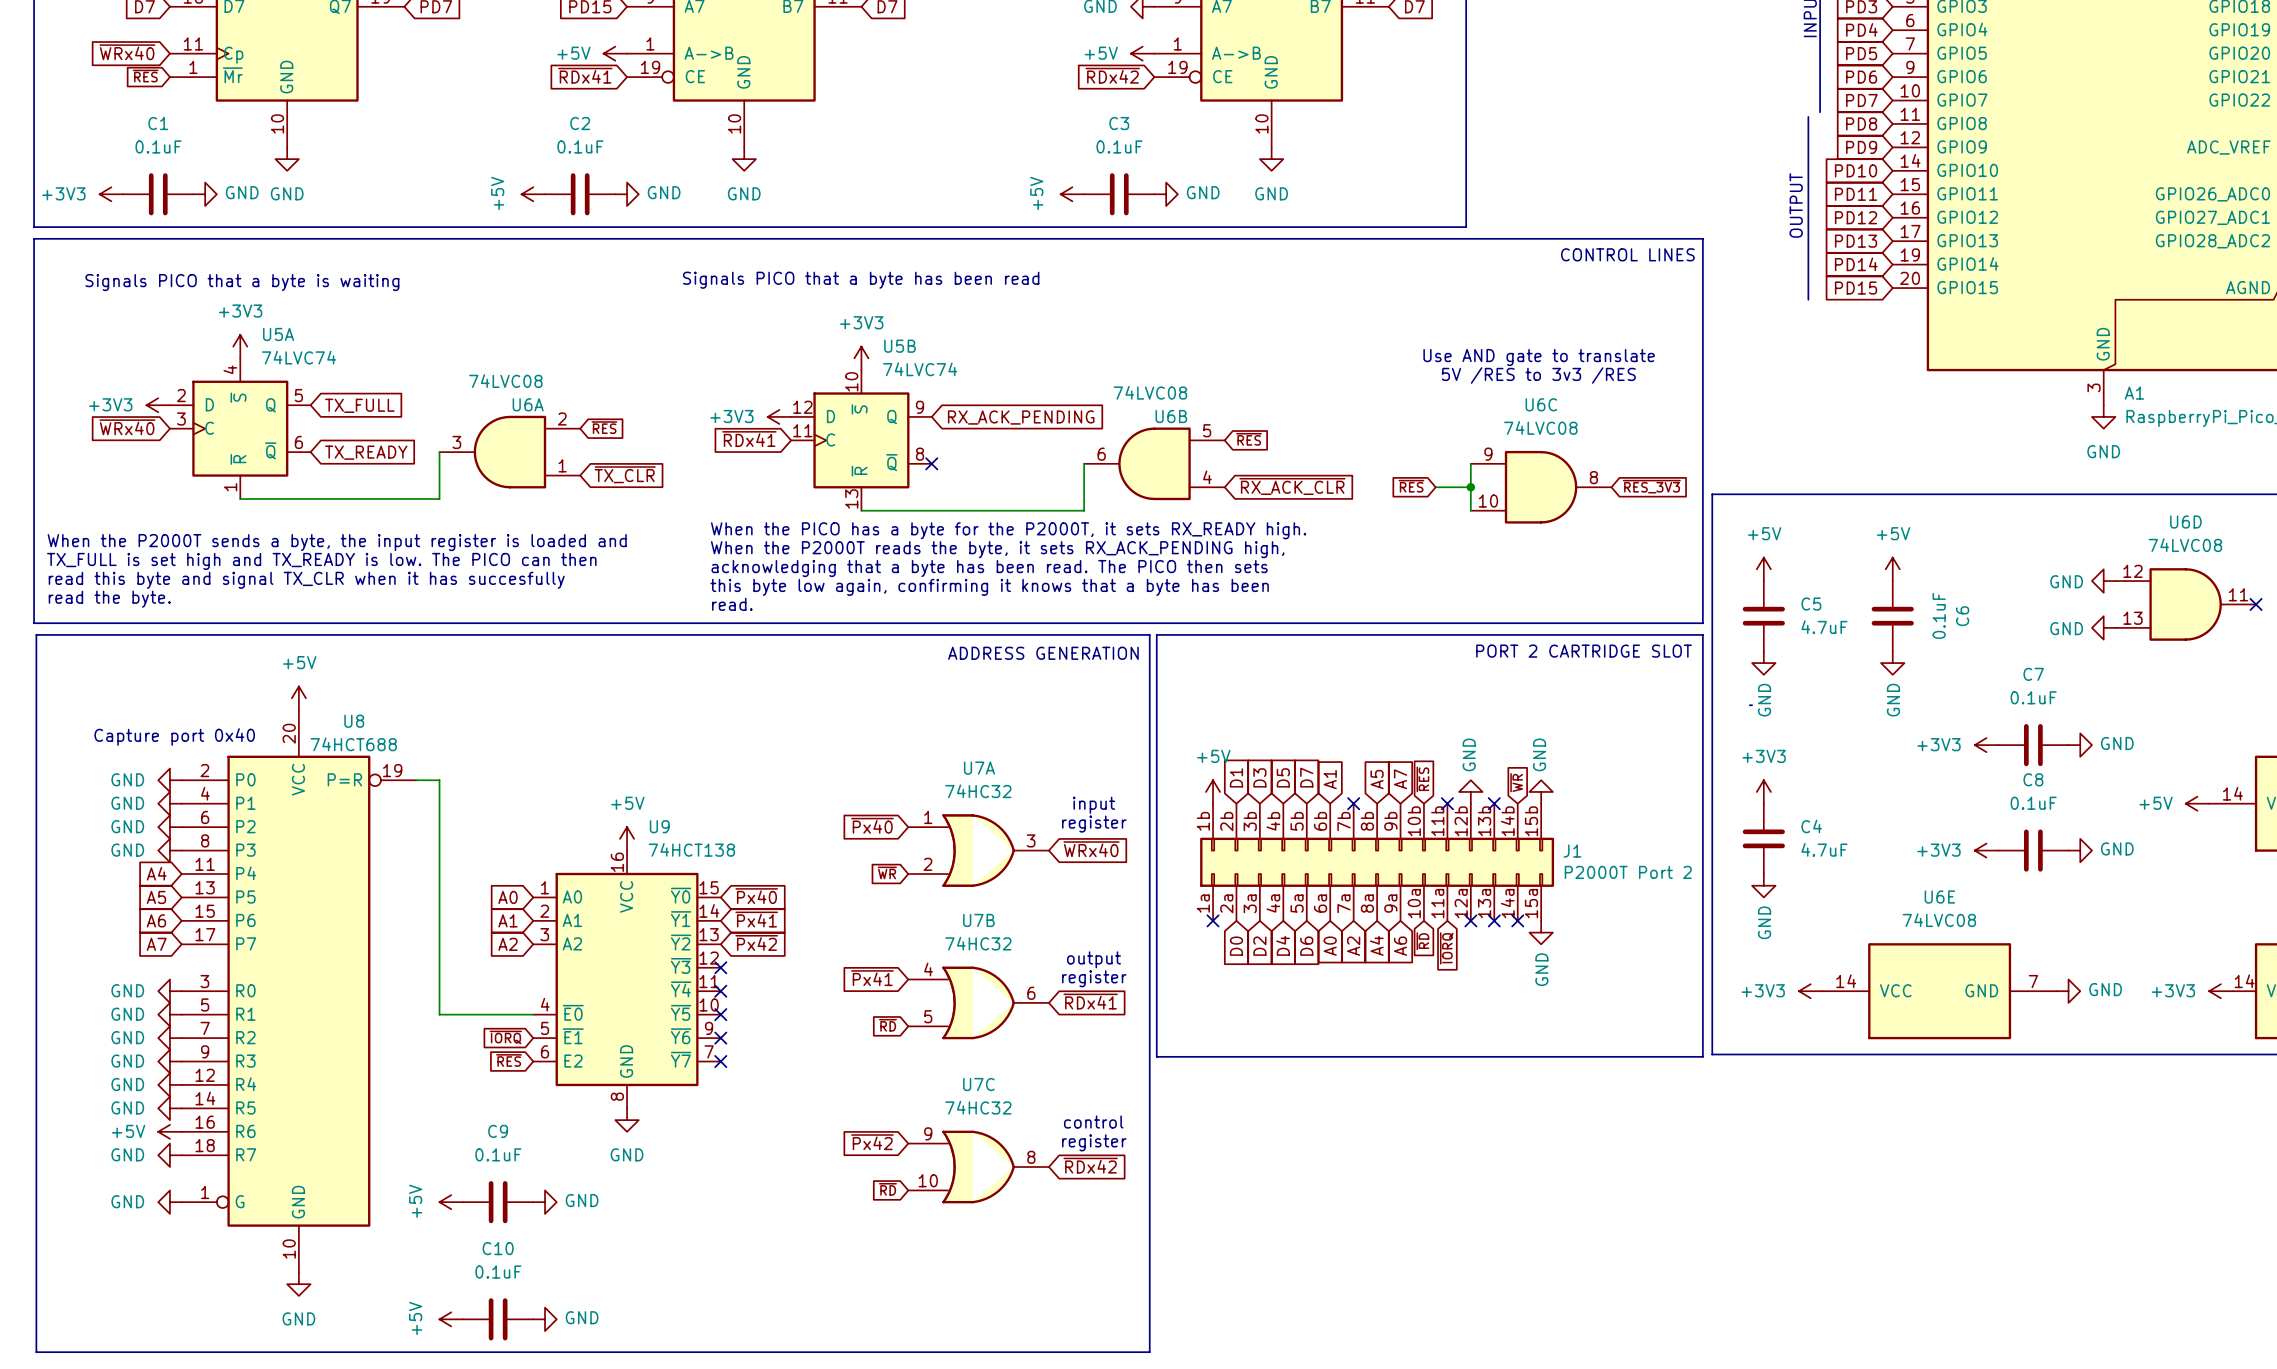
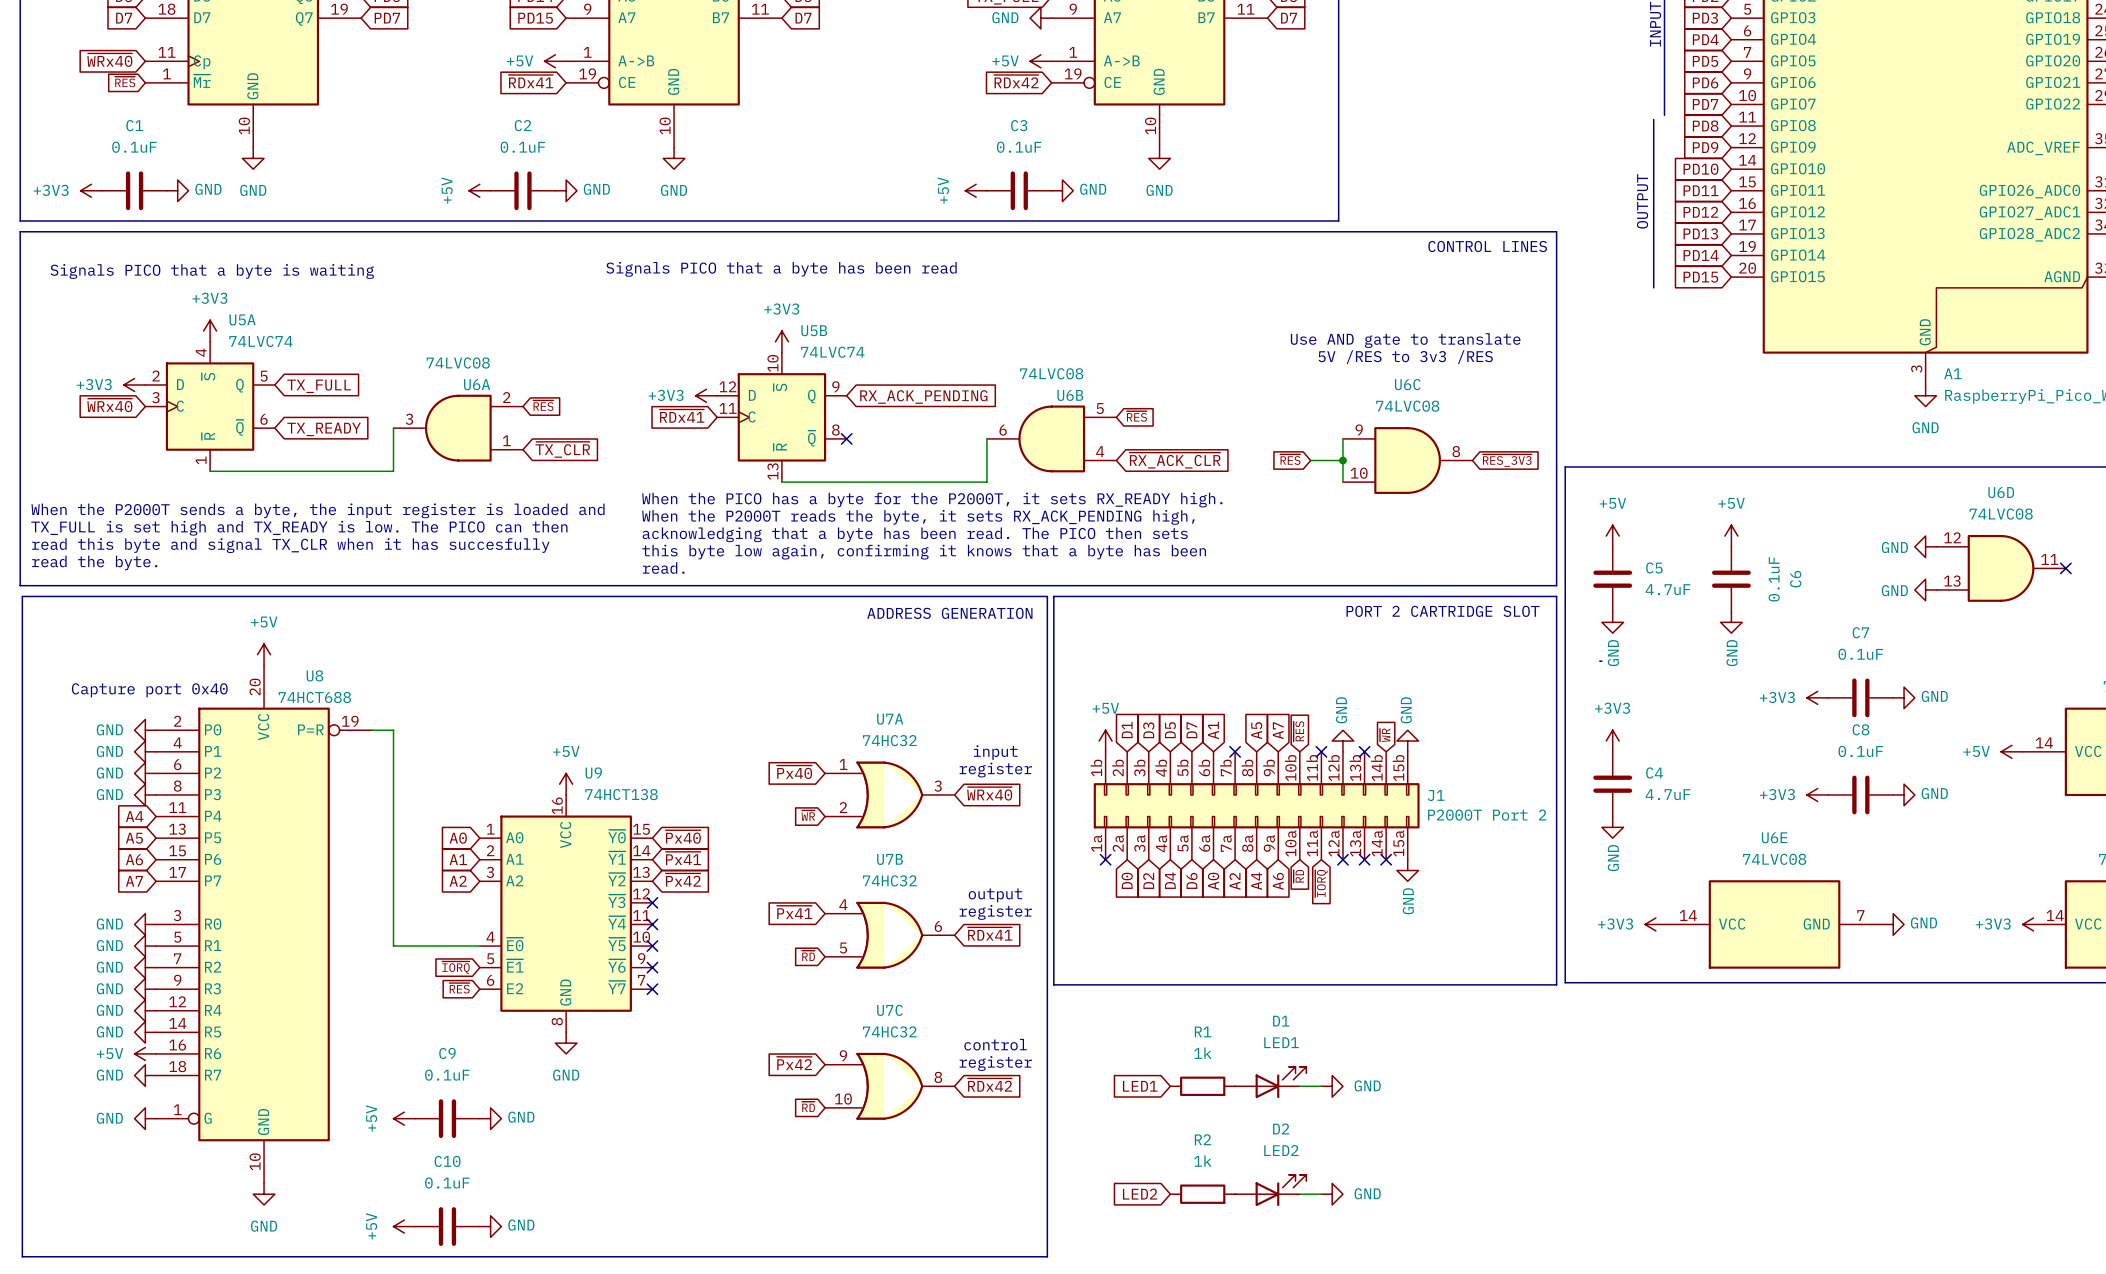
D1: none -> LED1 (1270, 1082)
global label: none -> LED1 (1140, 1086)
R1: none -> 1k (1202, 1086)
wire: none -> (1299, 1086) (1321, 1086)
power symbol: none -> GND (1332, 1086)
D2: none -> LED2 (1270, 1190)
global label: none -> LED2 (1140, 1194)
R2: none -> 1k (1202, 1194)
wire: none -> (1299, 1194) (1321, 1194)
power symbol: none -> GND (1332, 1194)

